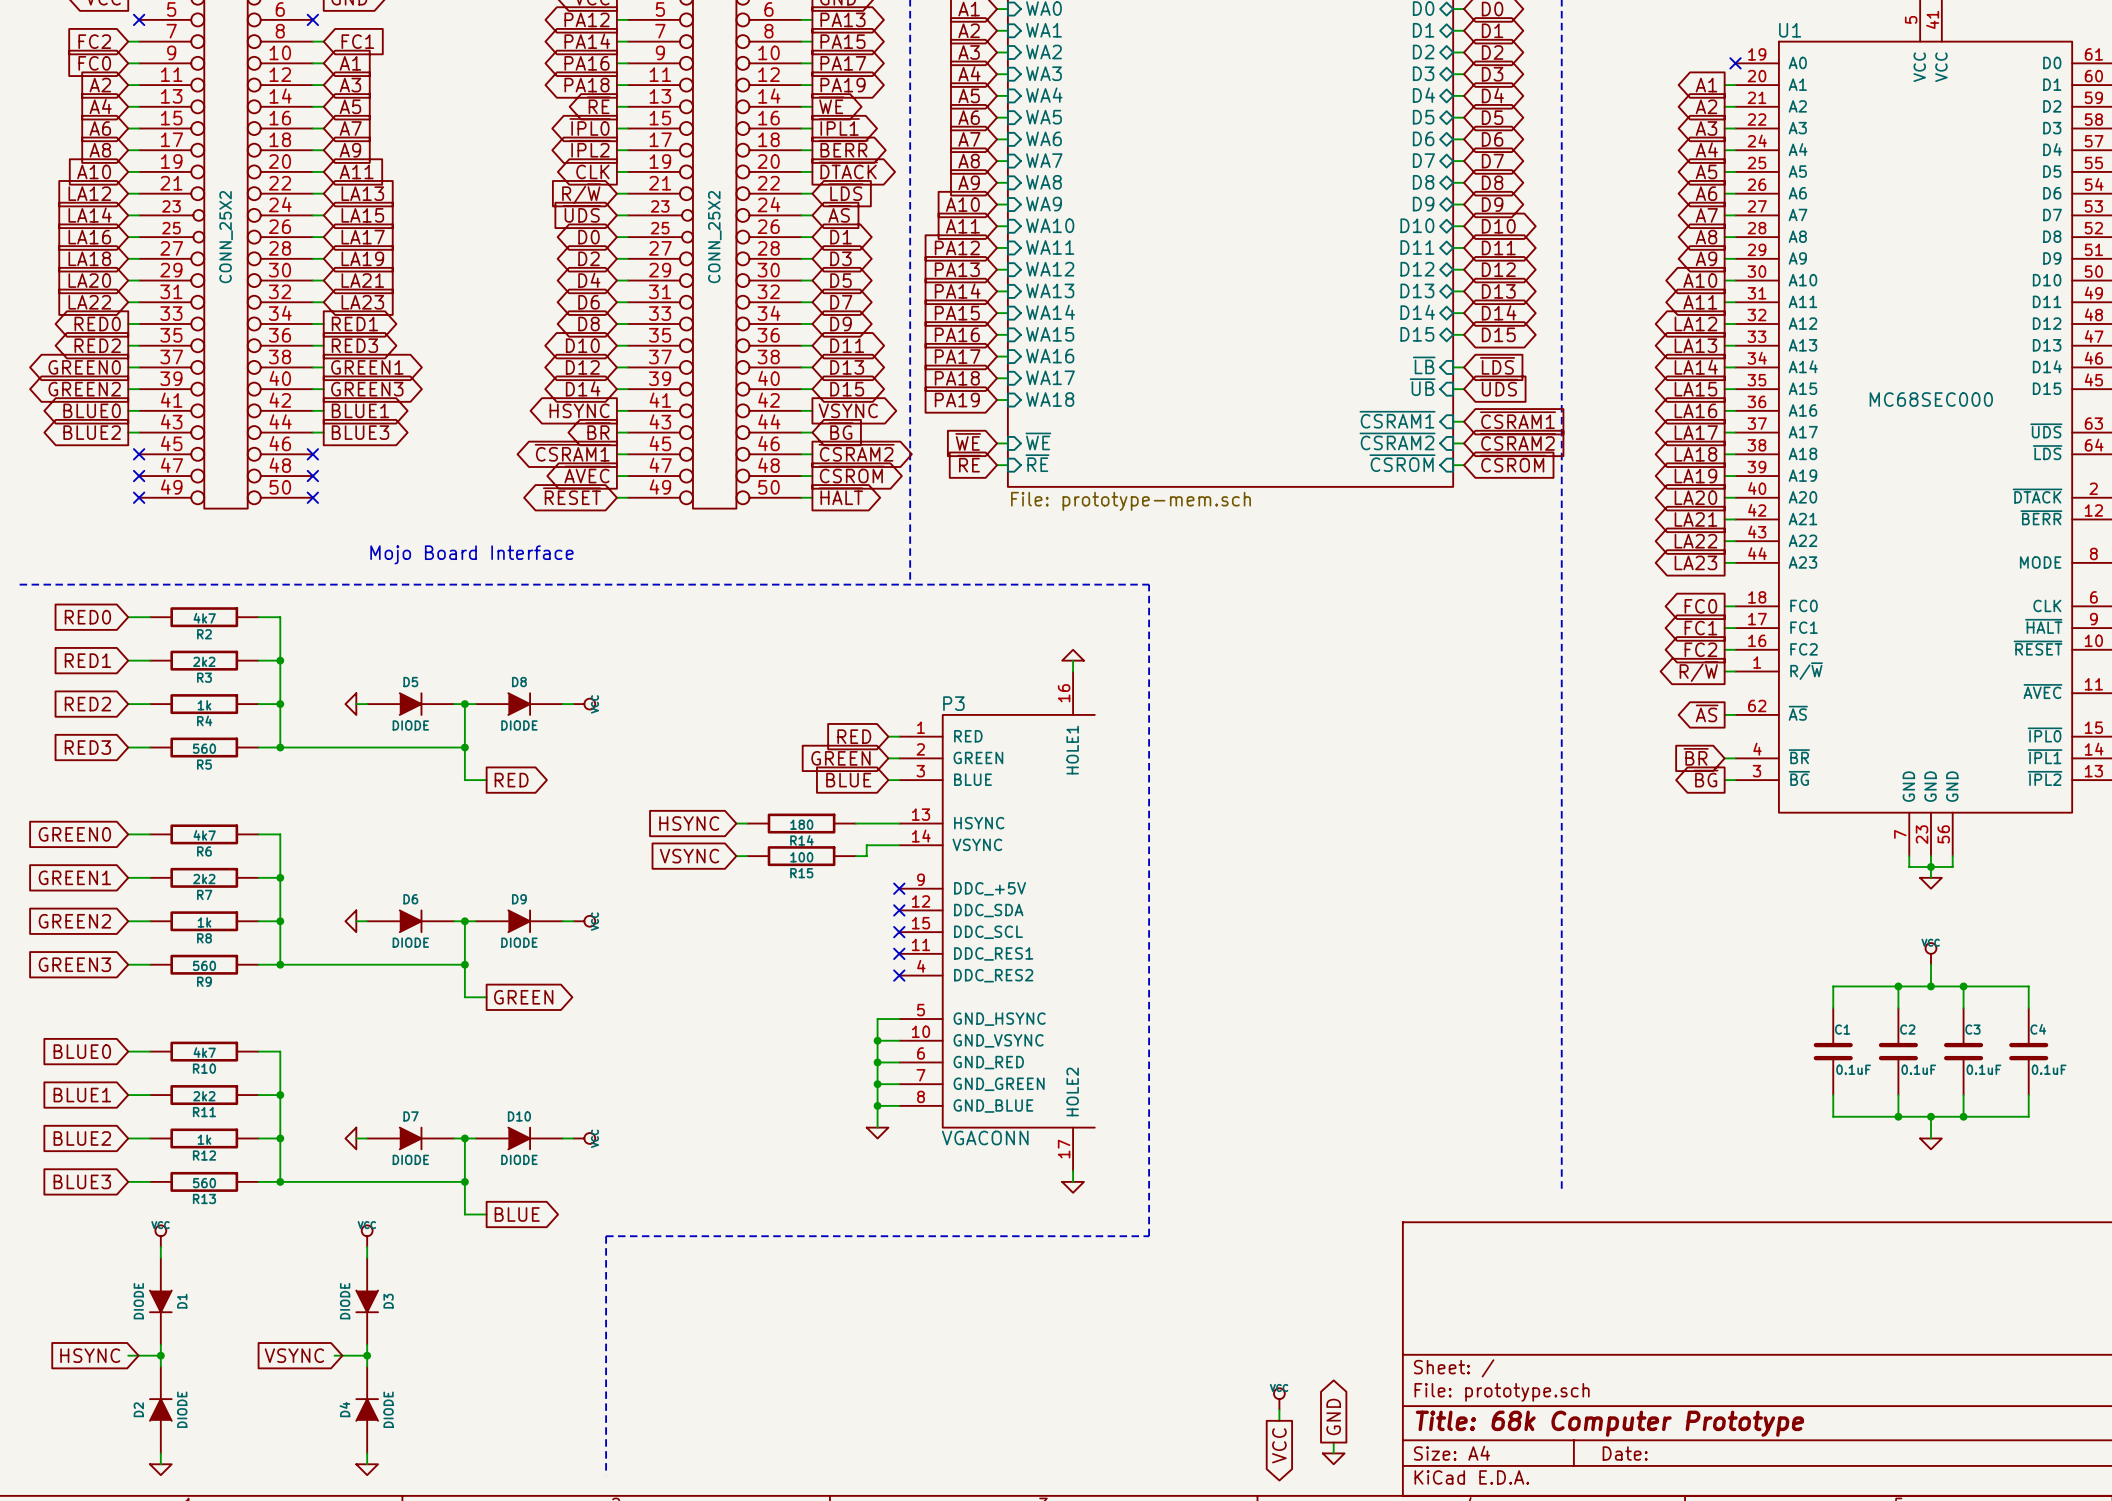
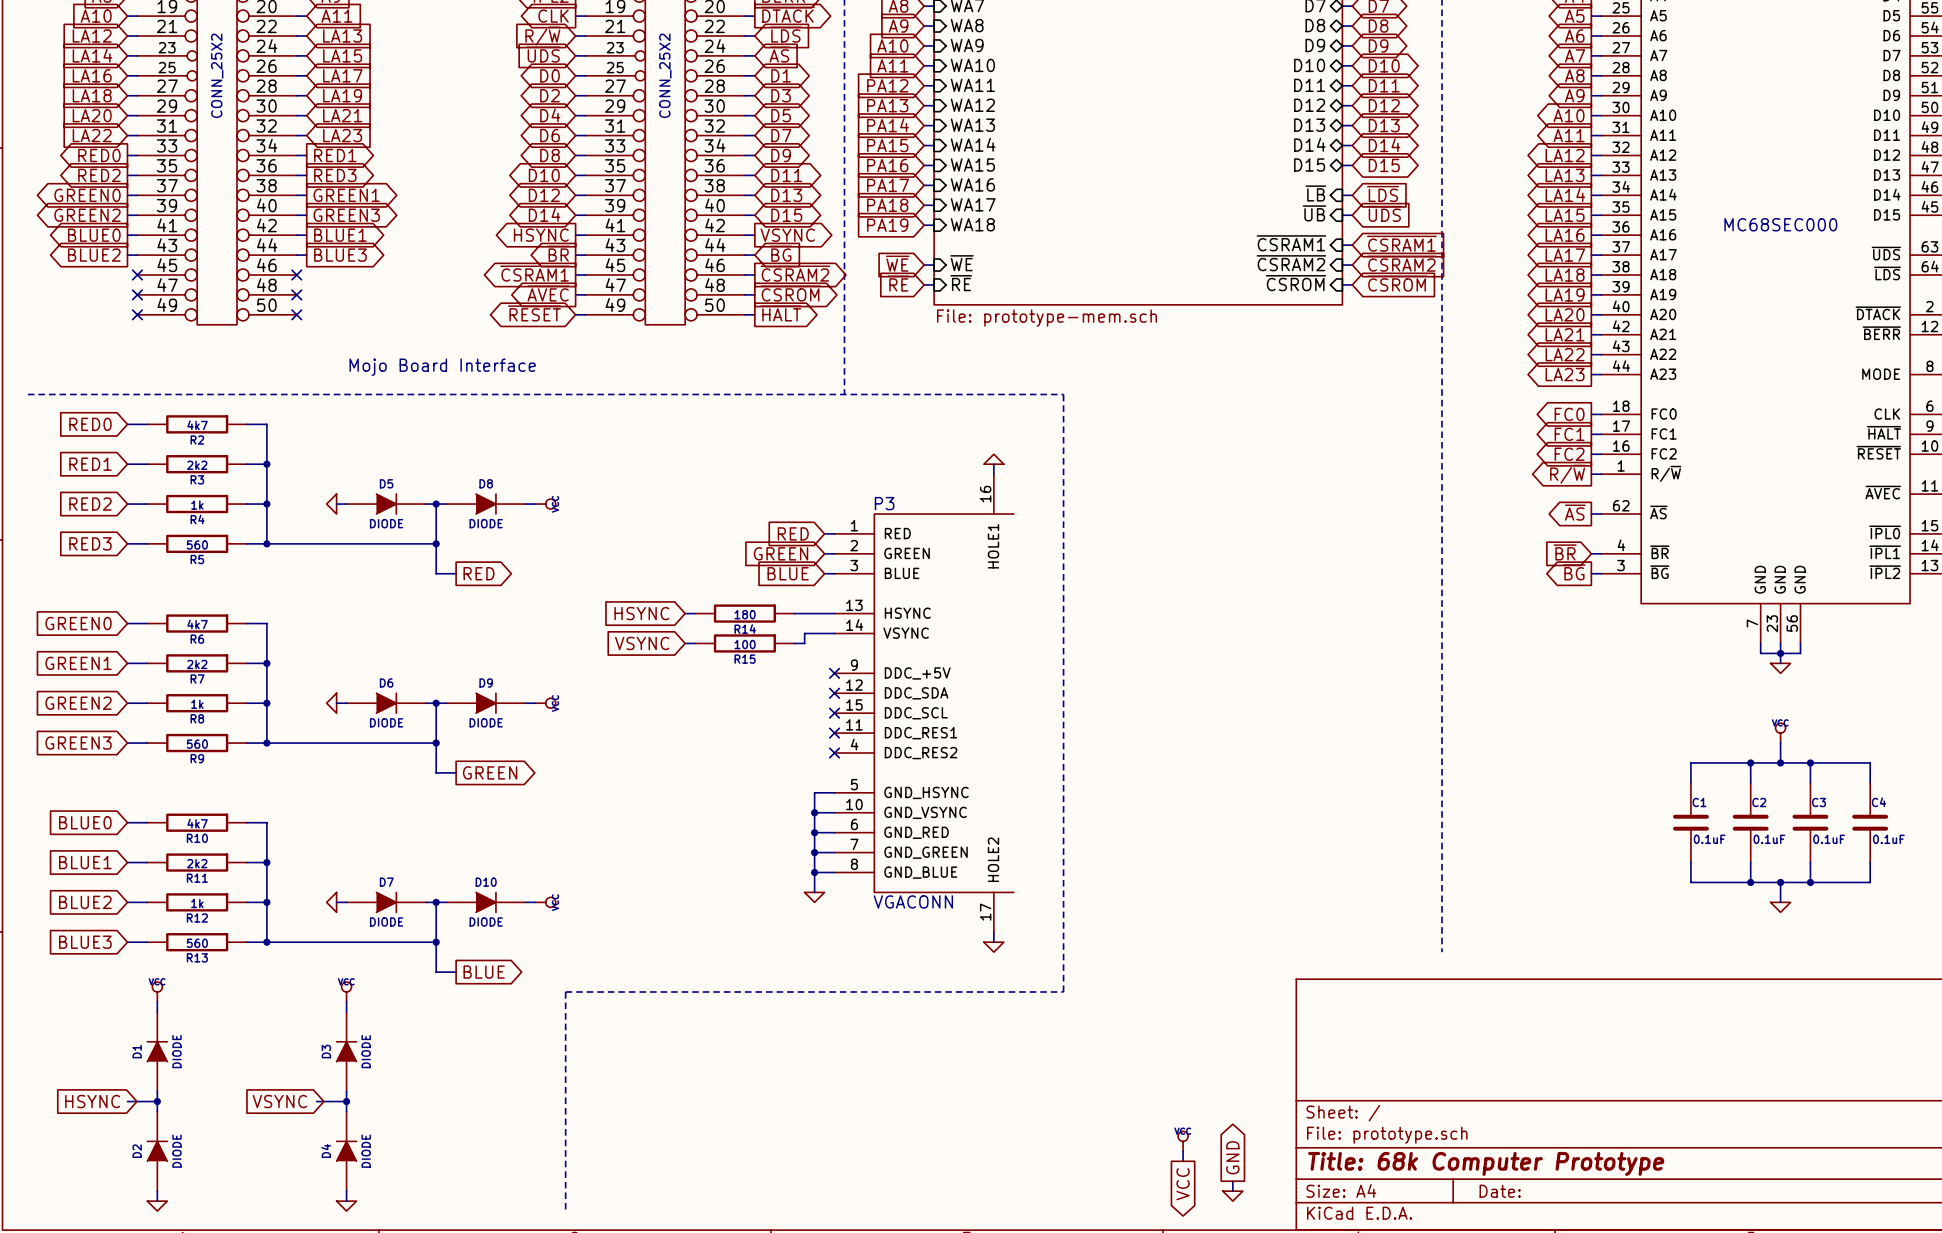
D1 rotation: 0° (160, 1301) -> 180° (157, 1051)
D3 rotation: 0° (367, 1301) -> 180° (346, 1051)

